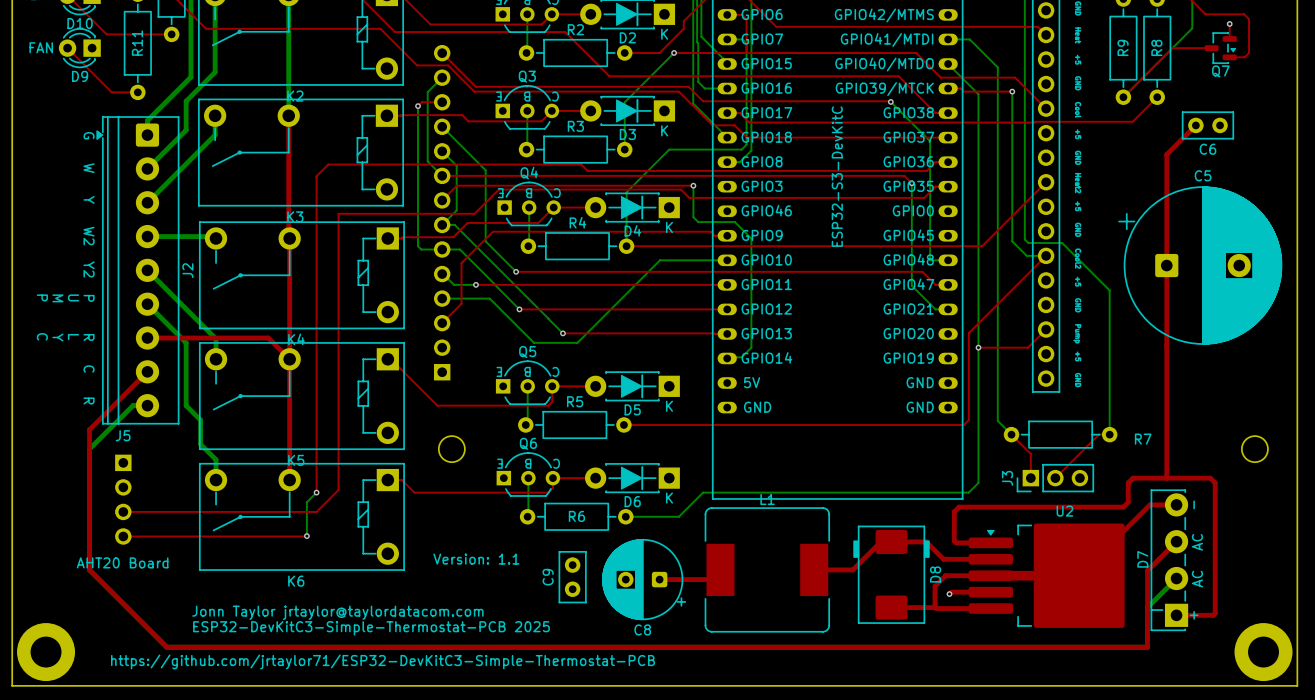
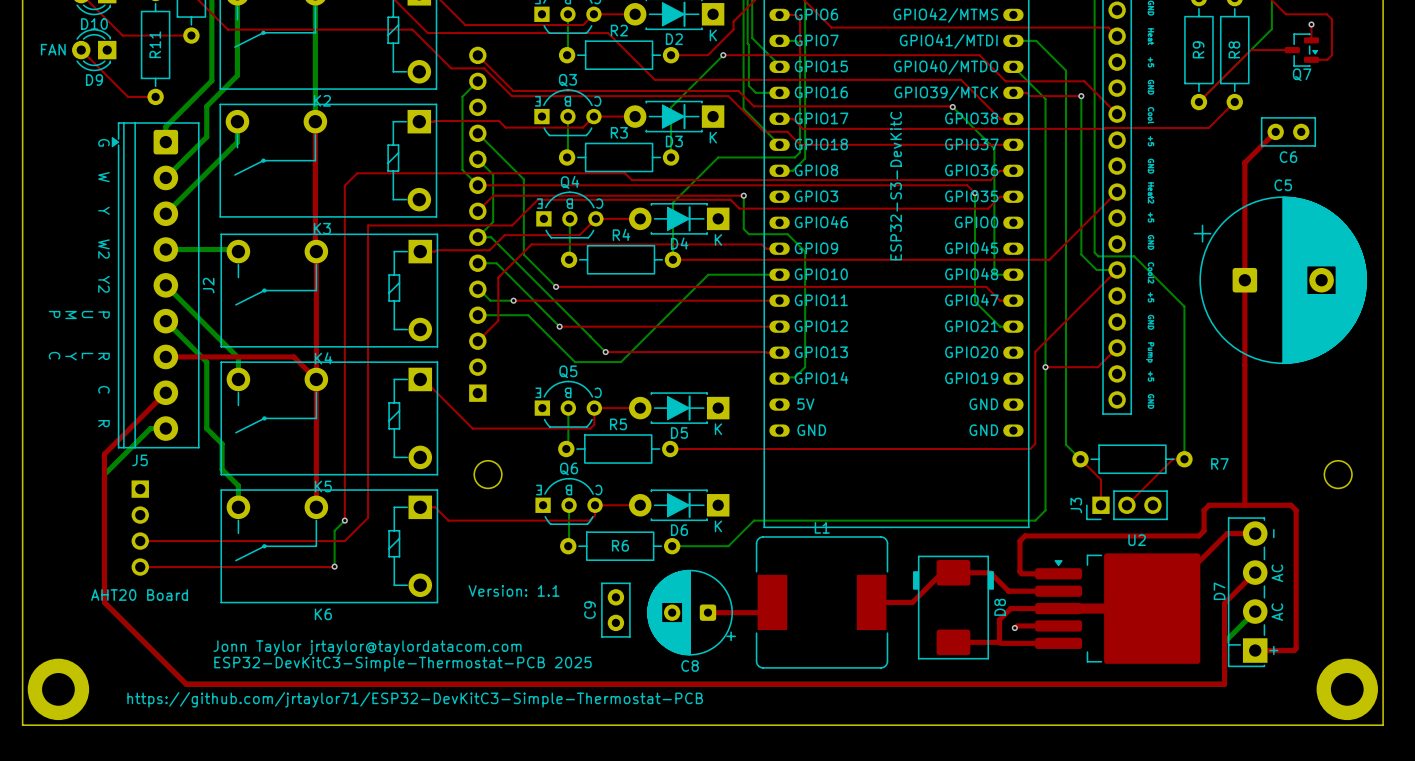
top track: (442, 102) (421, 102) (418, 106) -> none
bottom track: (418, 106) (418, 246) (421, 249) (442, 249) -> none
via: (418, 106) -> none

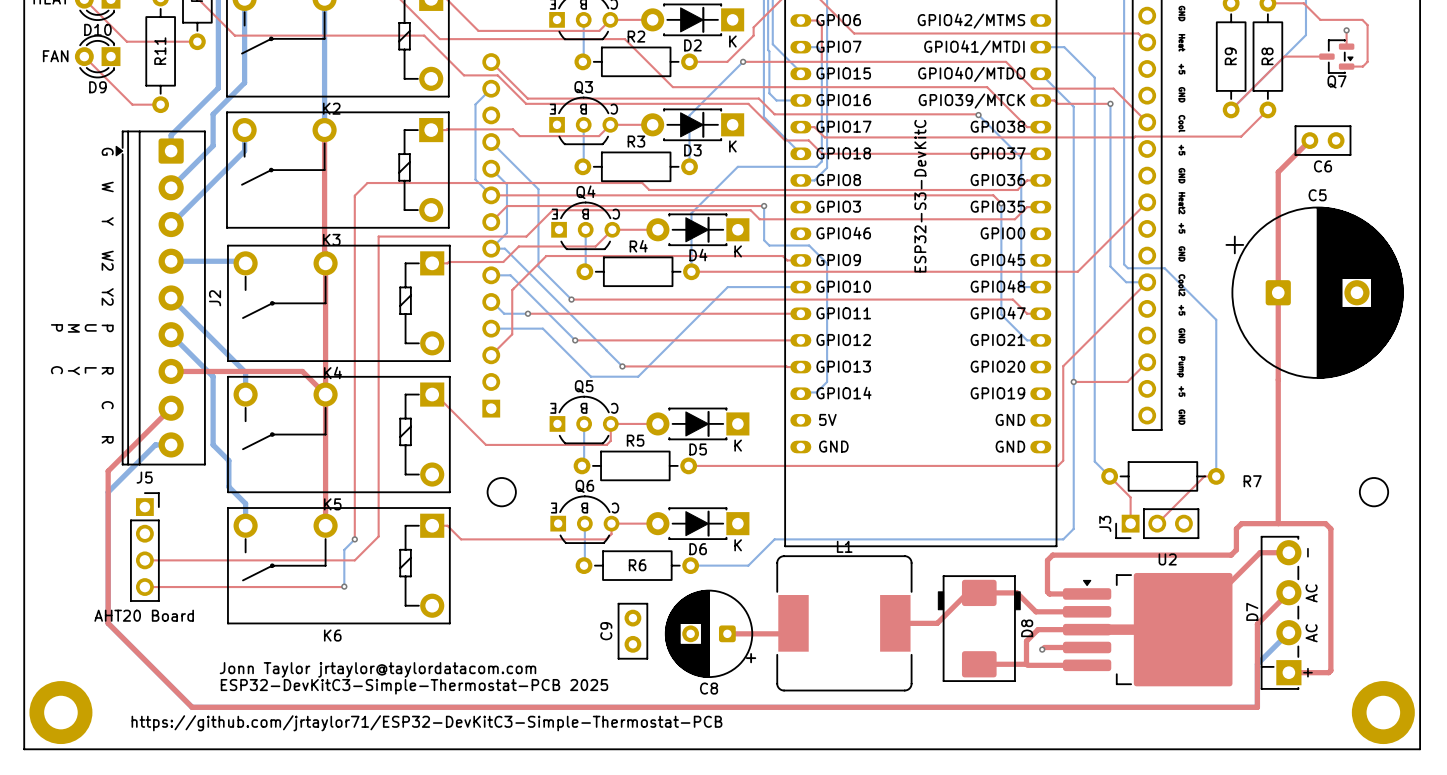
J5 side: bottom (140, 528) -> top (144, 547)
text: Version: 1.1 (514, 590) -> none

